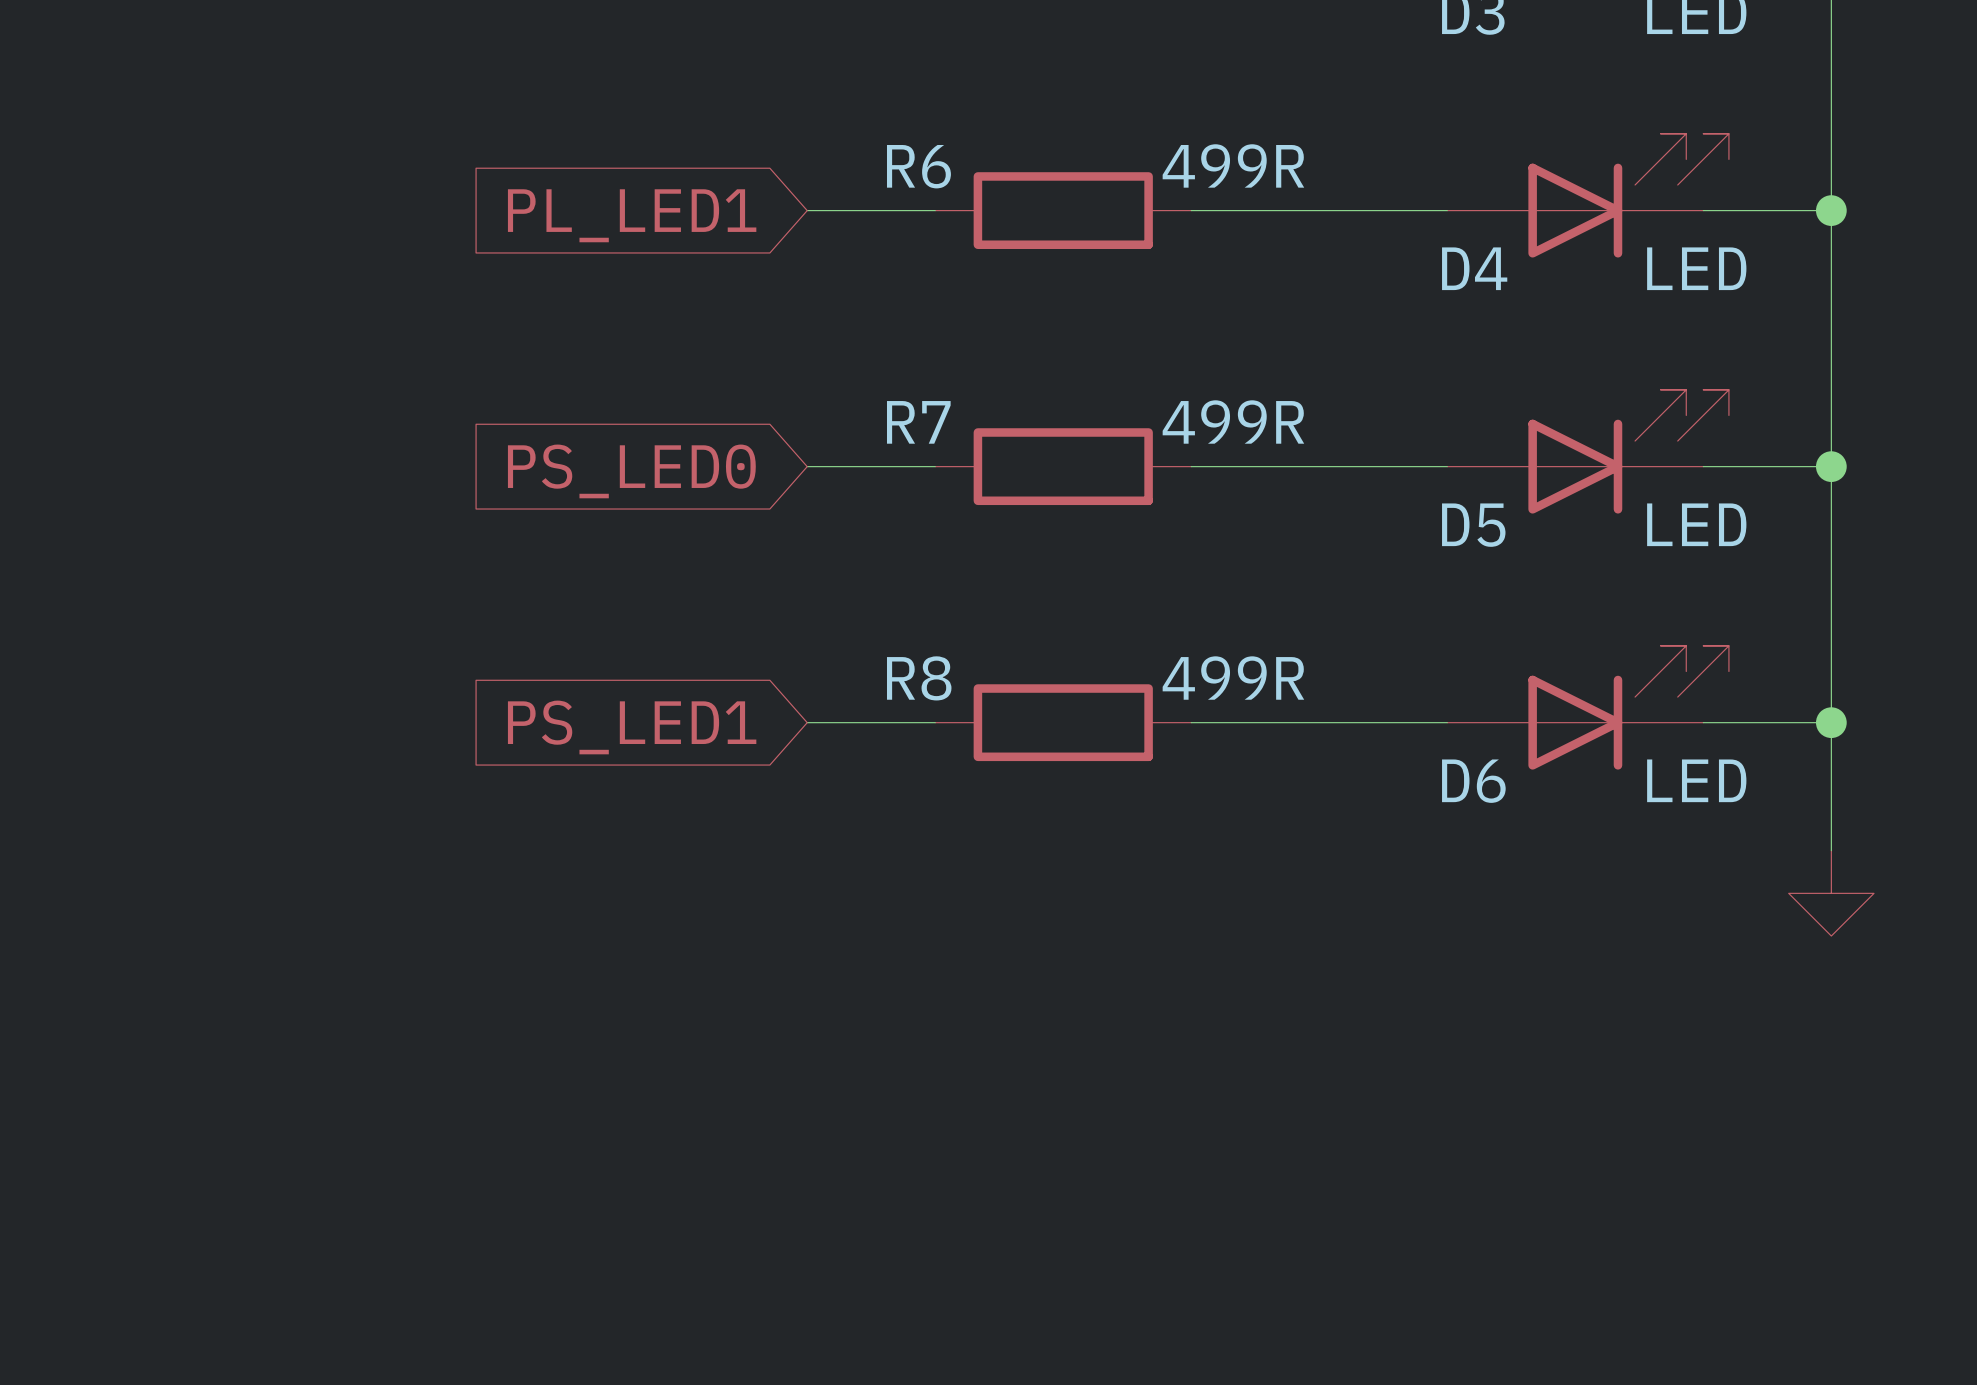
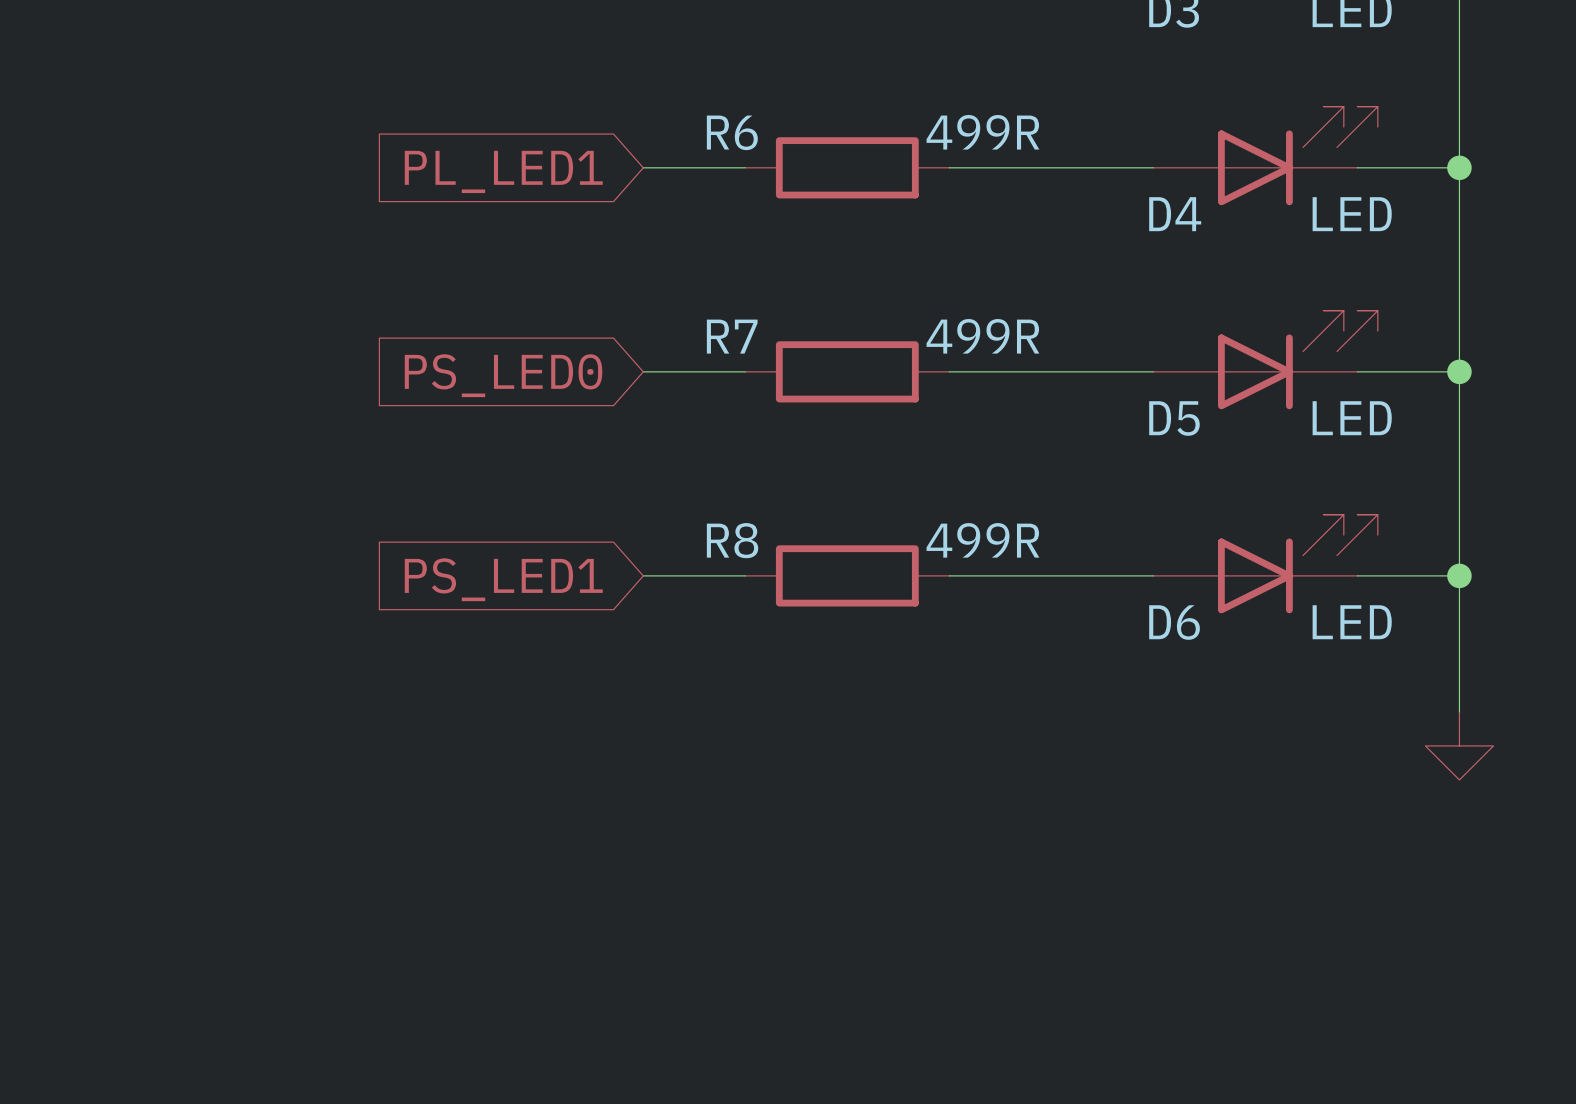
power symbol position: (1831, 893) -> (1459, 745)

